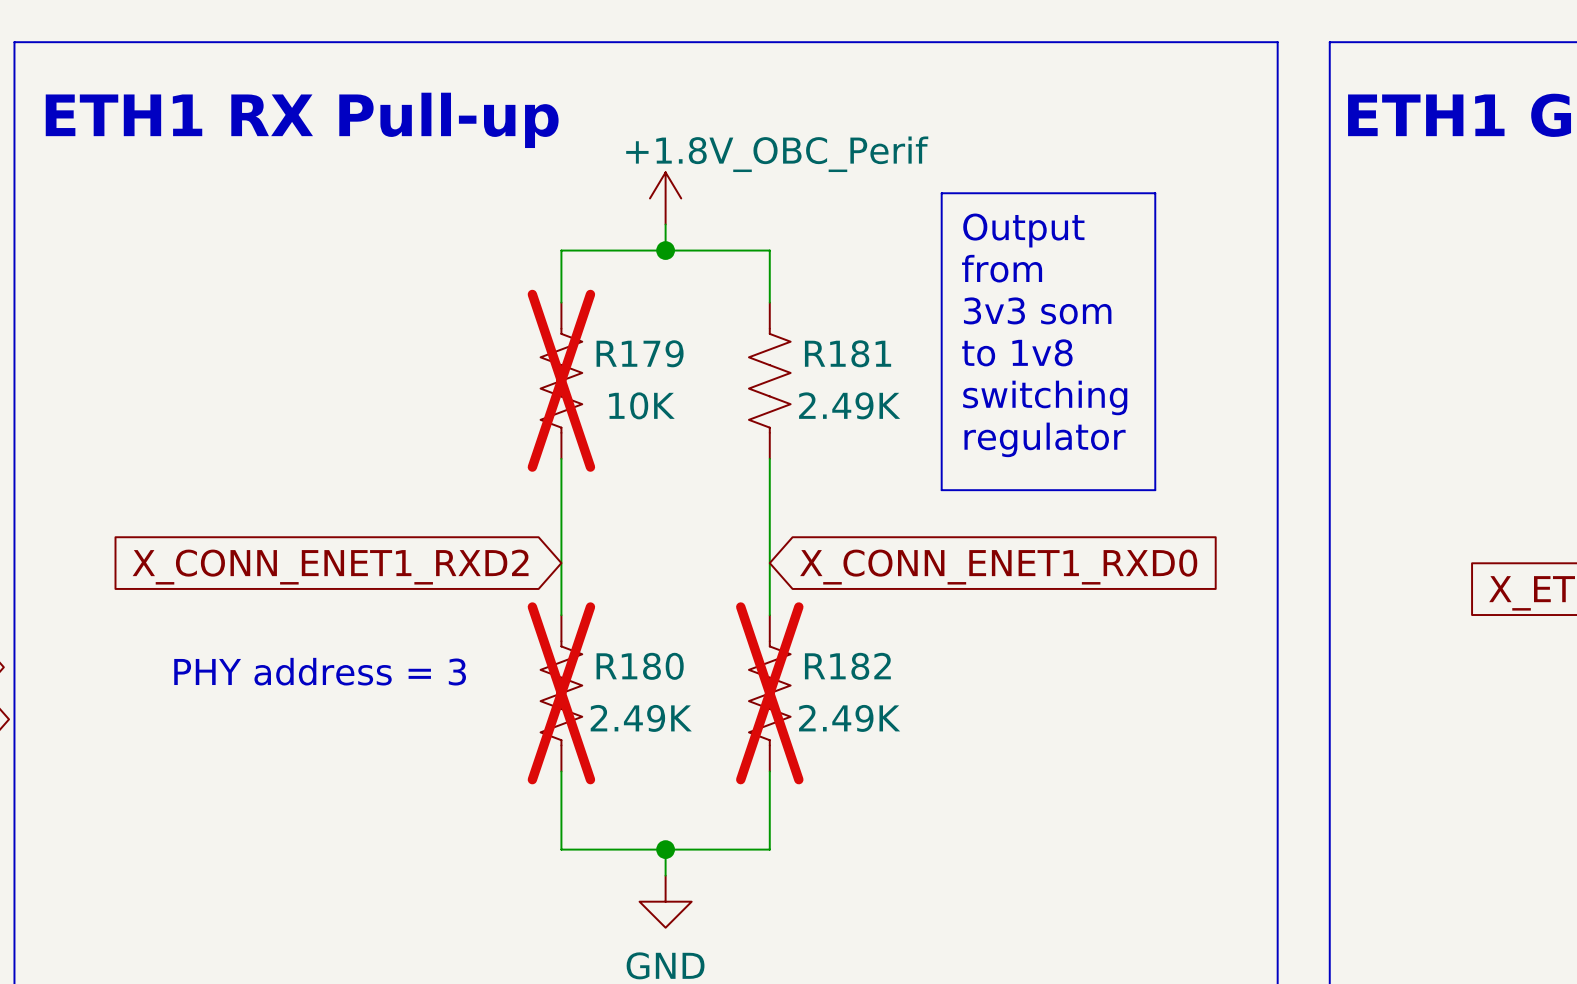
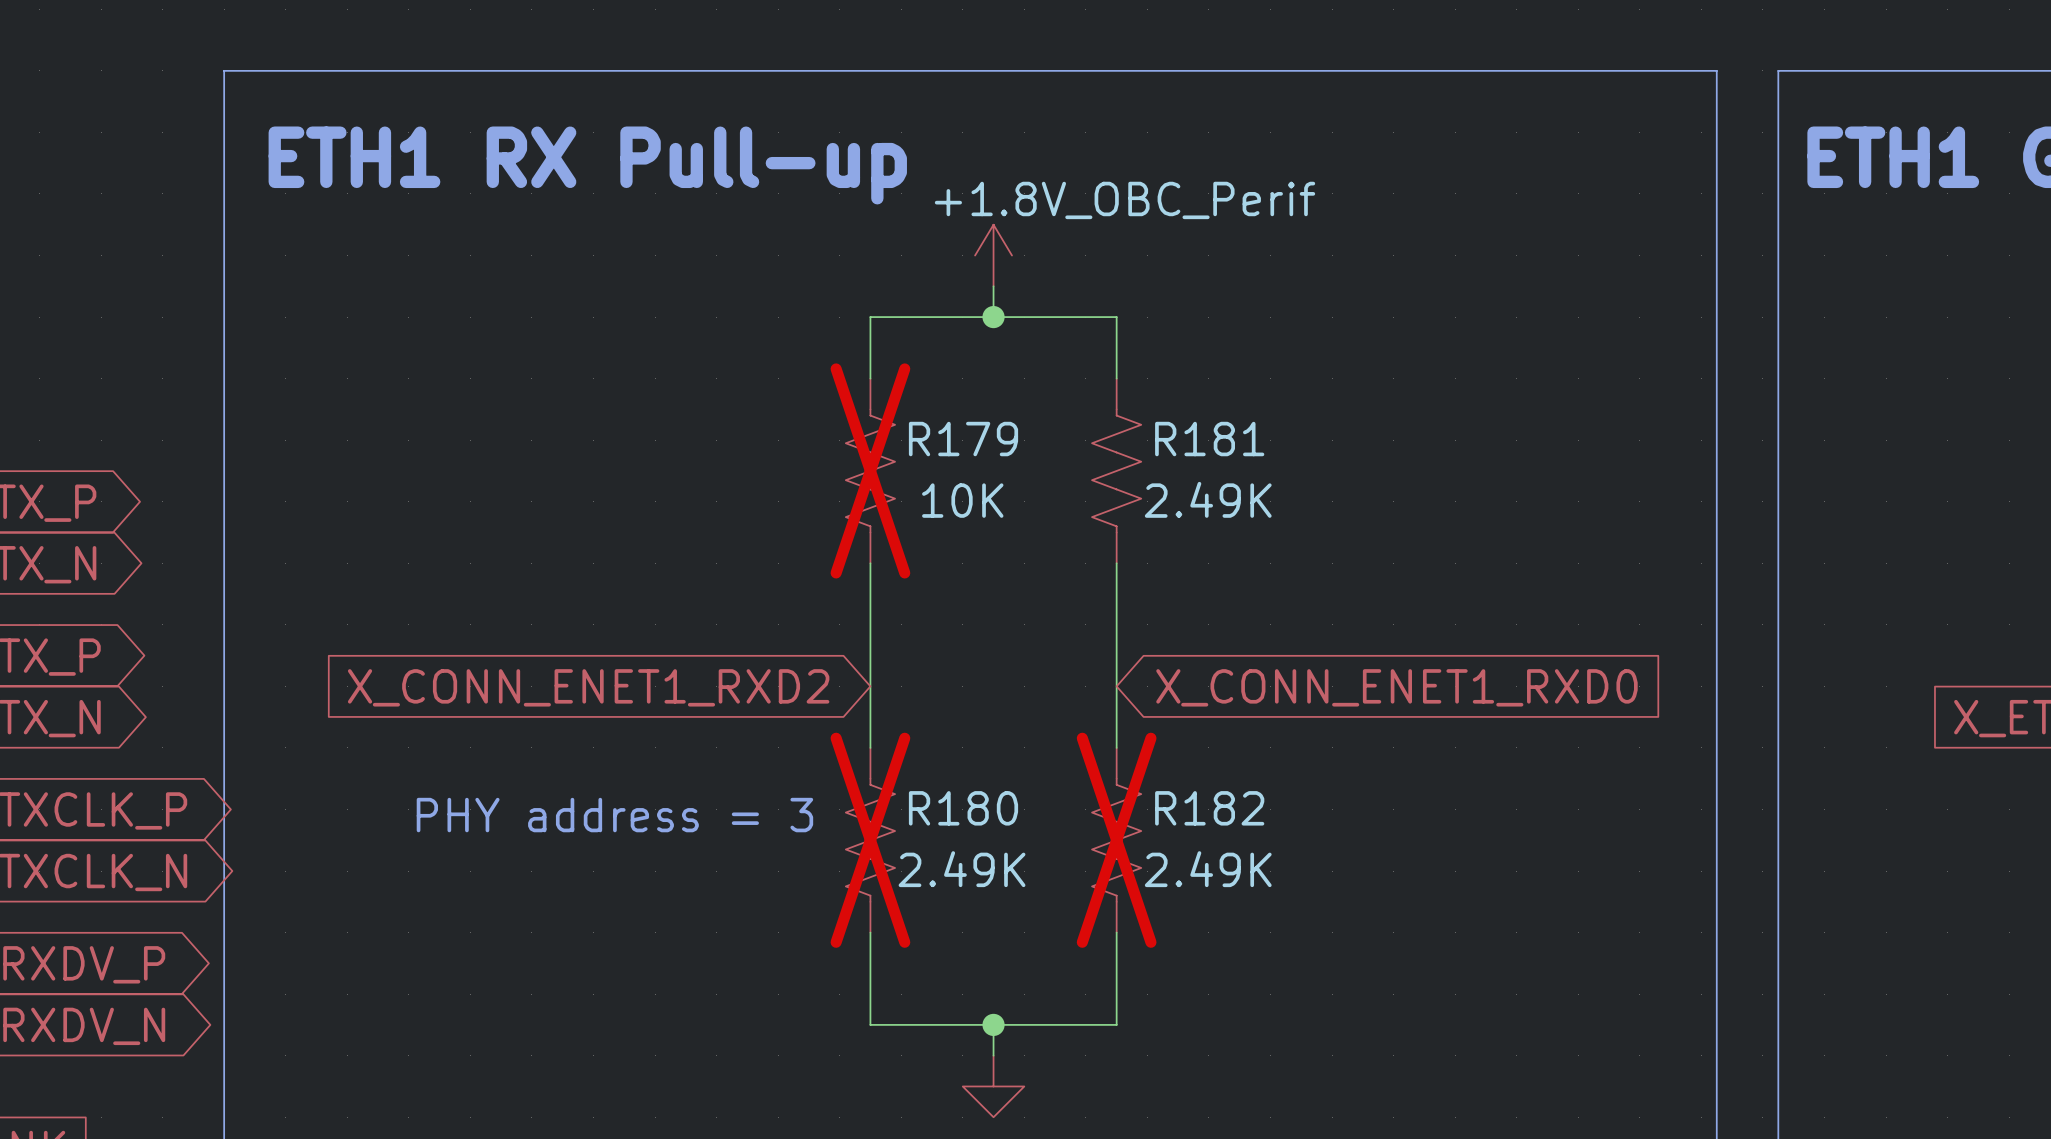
line: (941, 193) (1155, 193) (1155, 490) (941, 490) (941, 193) -> none
text: Output (1023, 230) -> none
text: from (1002, 268) -> none
text: 3v3 som (1037, 310) -> none
text: to 1v8 (1017, 352) -> none
text: switching (1045, 397) -> none
text: regulator (1045, 439) -> none

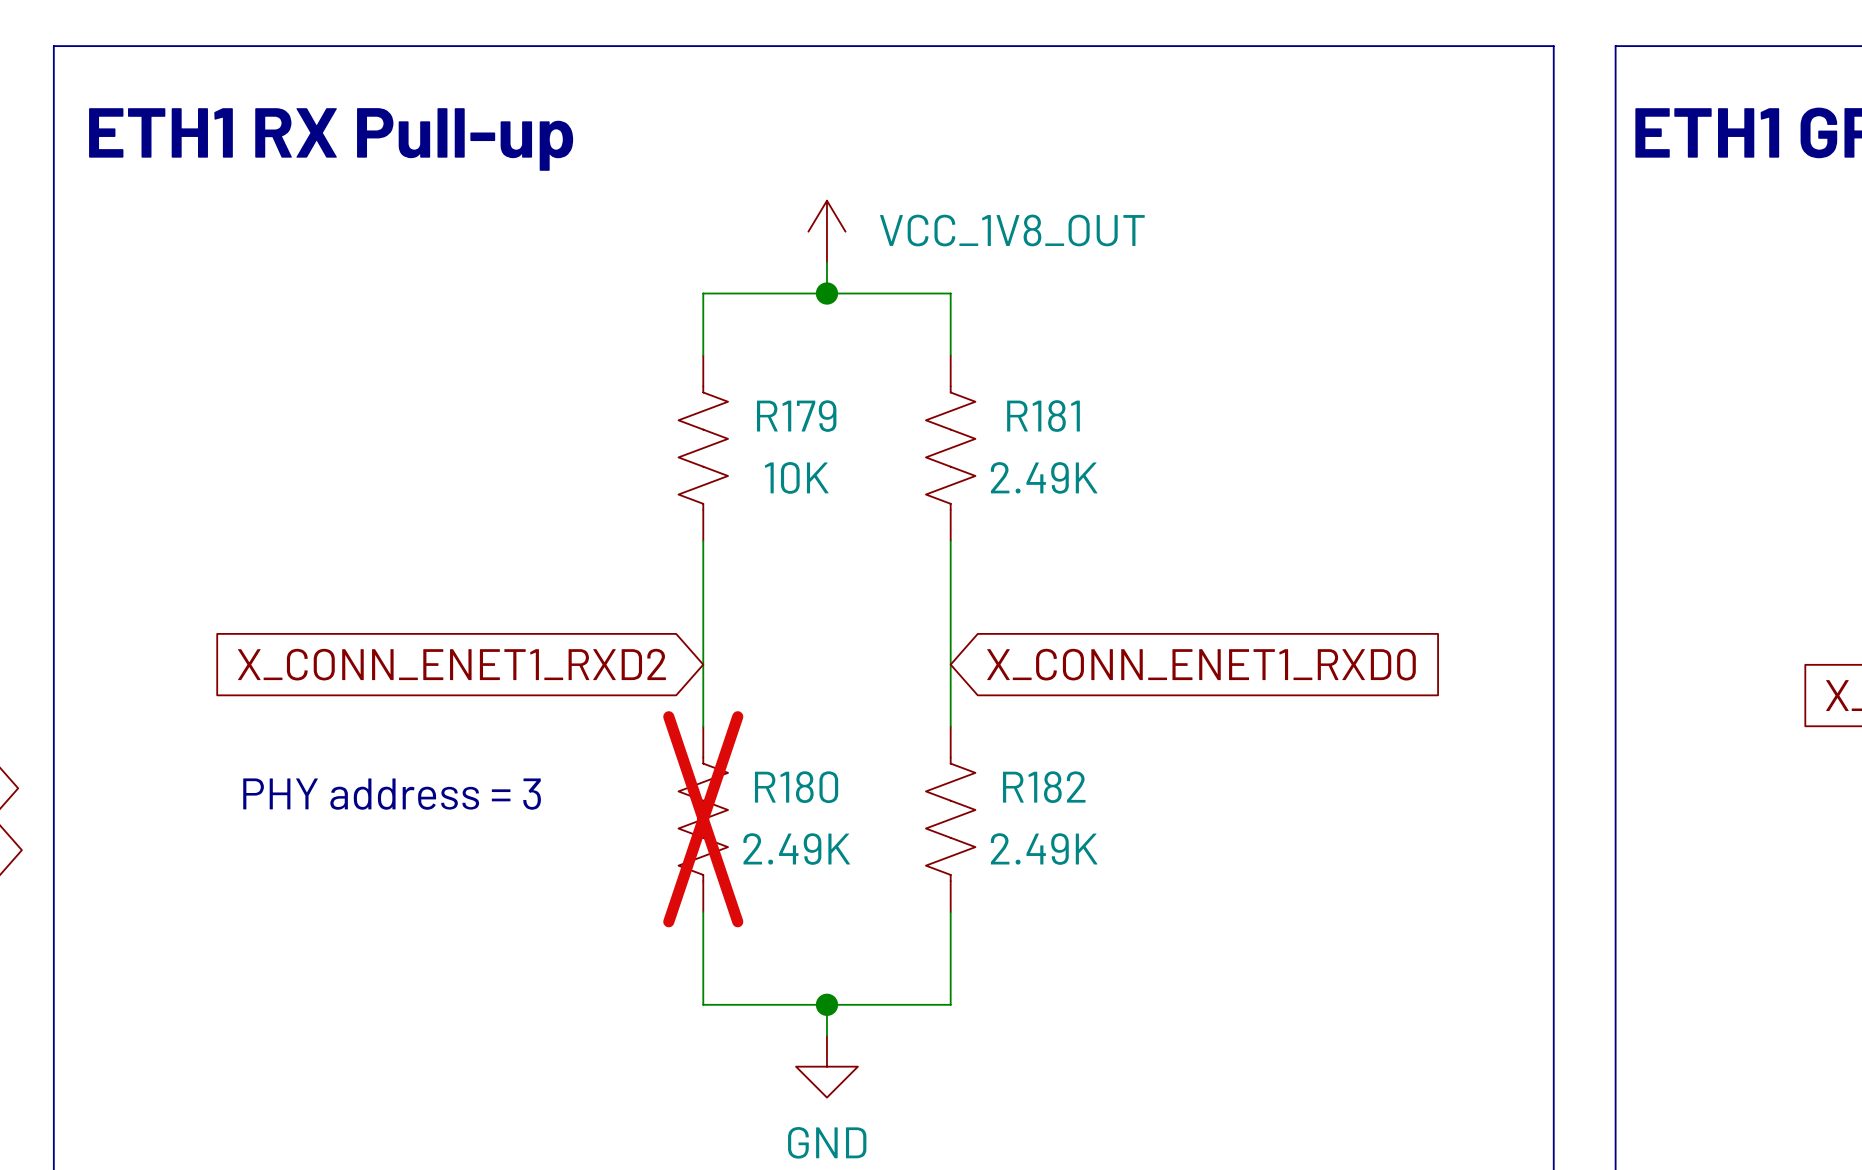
power symbol: +1.8V_OBC_Perif (993, 255) -> VCC_1V8_OUT (826, 231)
R179 do-not-place cross: (870, 470) -> none
R182 do-not-place cross: (1116, 840) -> none

